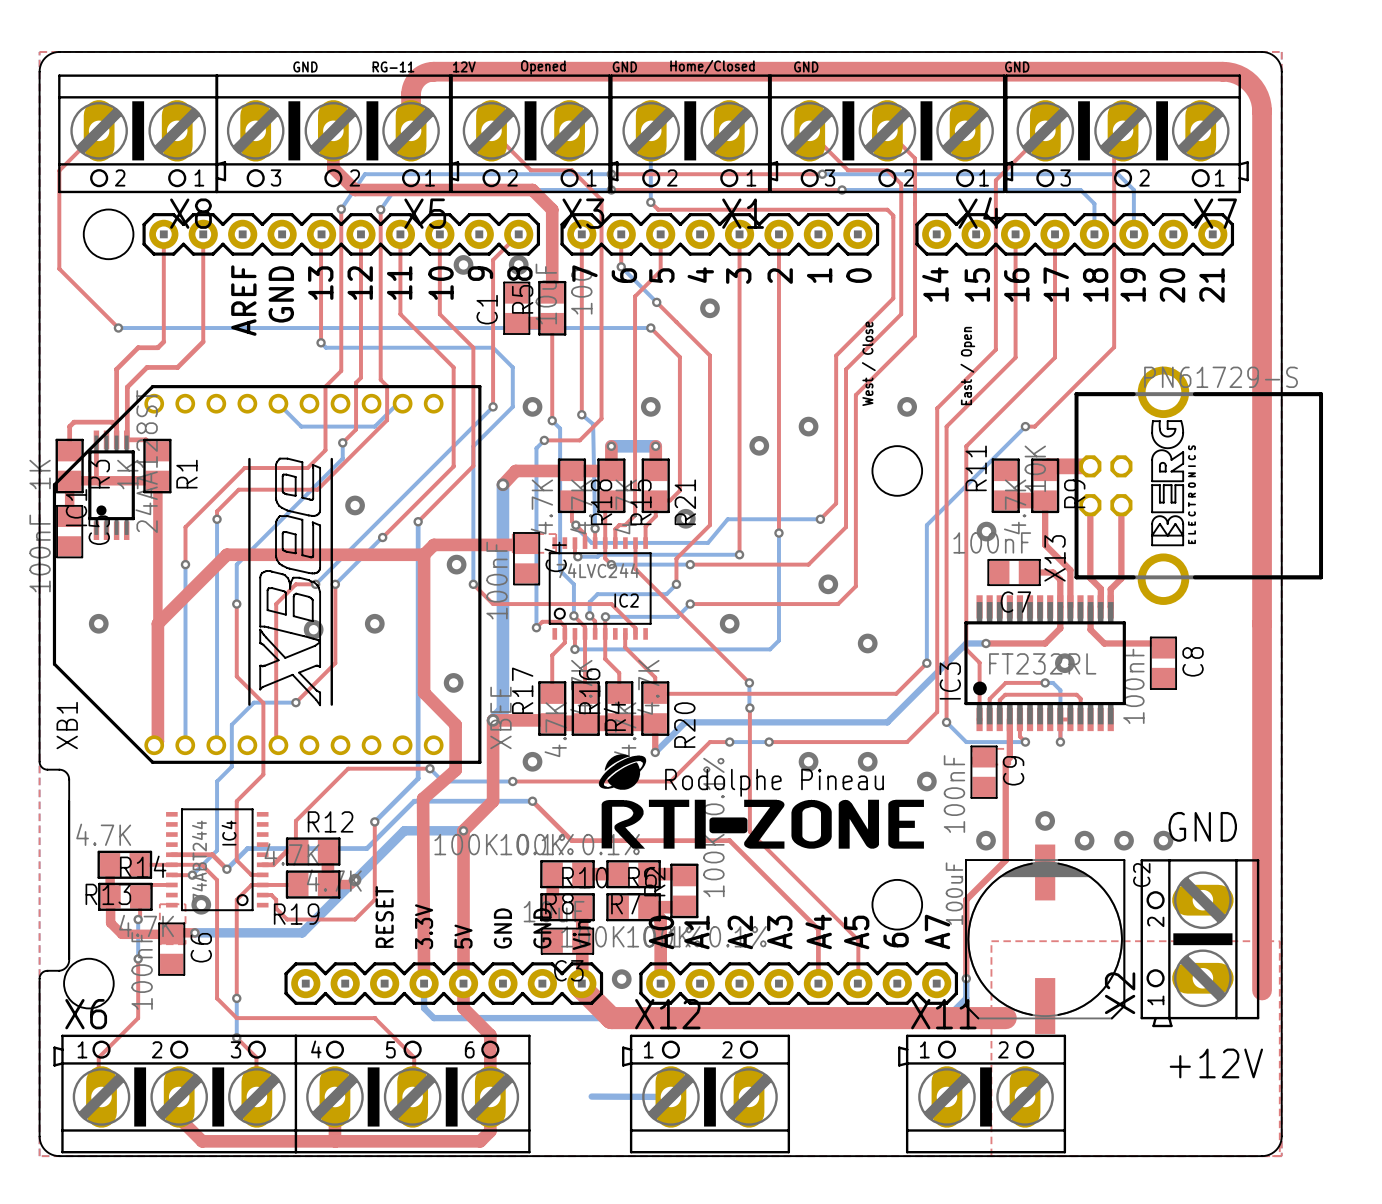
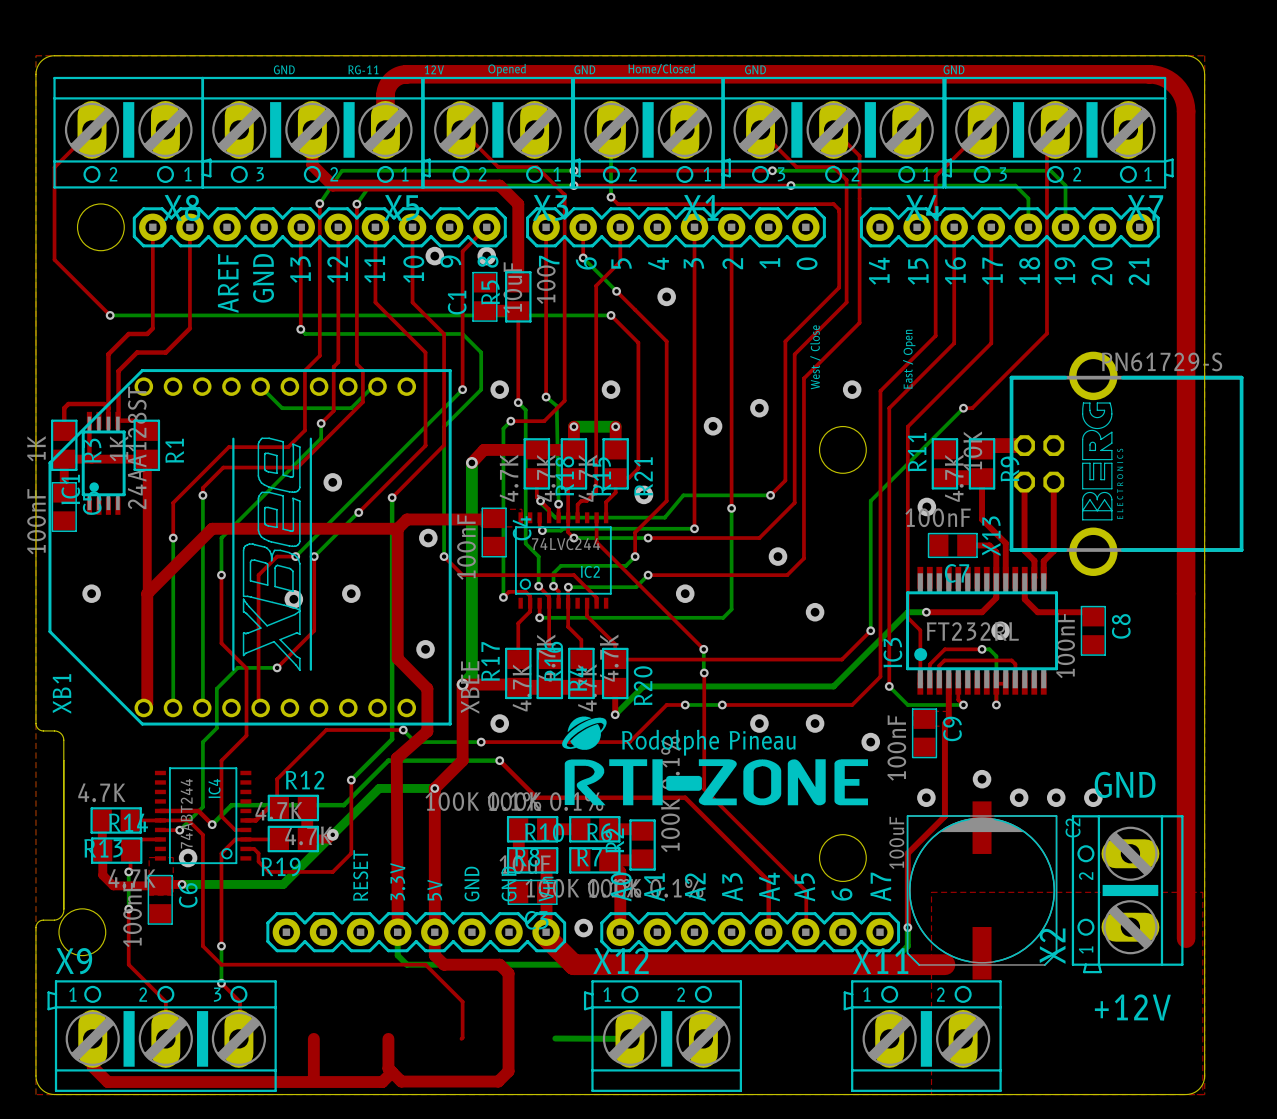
top track: (138, 1018) (98, 1057) (98, 1094) (101, 1096) -> (128, 964) (165, 1001) (165, 1038)
top track: (375, 1018) (414, 1057) (414, 1095) (412, 1096) -> (351, 964) (425, 964) (462, 1001) (461, 1038)
top track: (473, 1018) (490, 1035) (490, 1131) (480, 1141) (202, 1141) (177, 1116) (179, 1096) -> (444, 964) (499, 964) (508, 973) (508, 1071) (498, 1081) (401, 1081) (388, 1068) (388, 1038)
X9: none -> (162, 1036)
X6: (291, 1094) -> none
top track: none -> (92, 1038) (92, 1066) (107, 1082) (382, 1082) (392, 1072)

